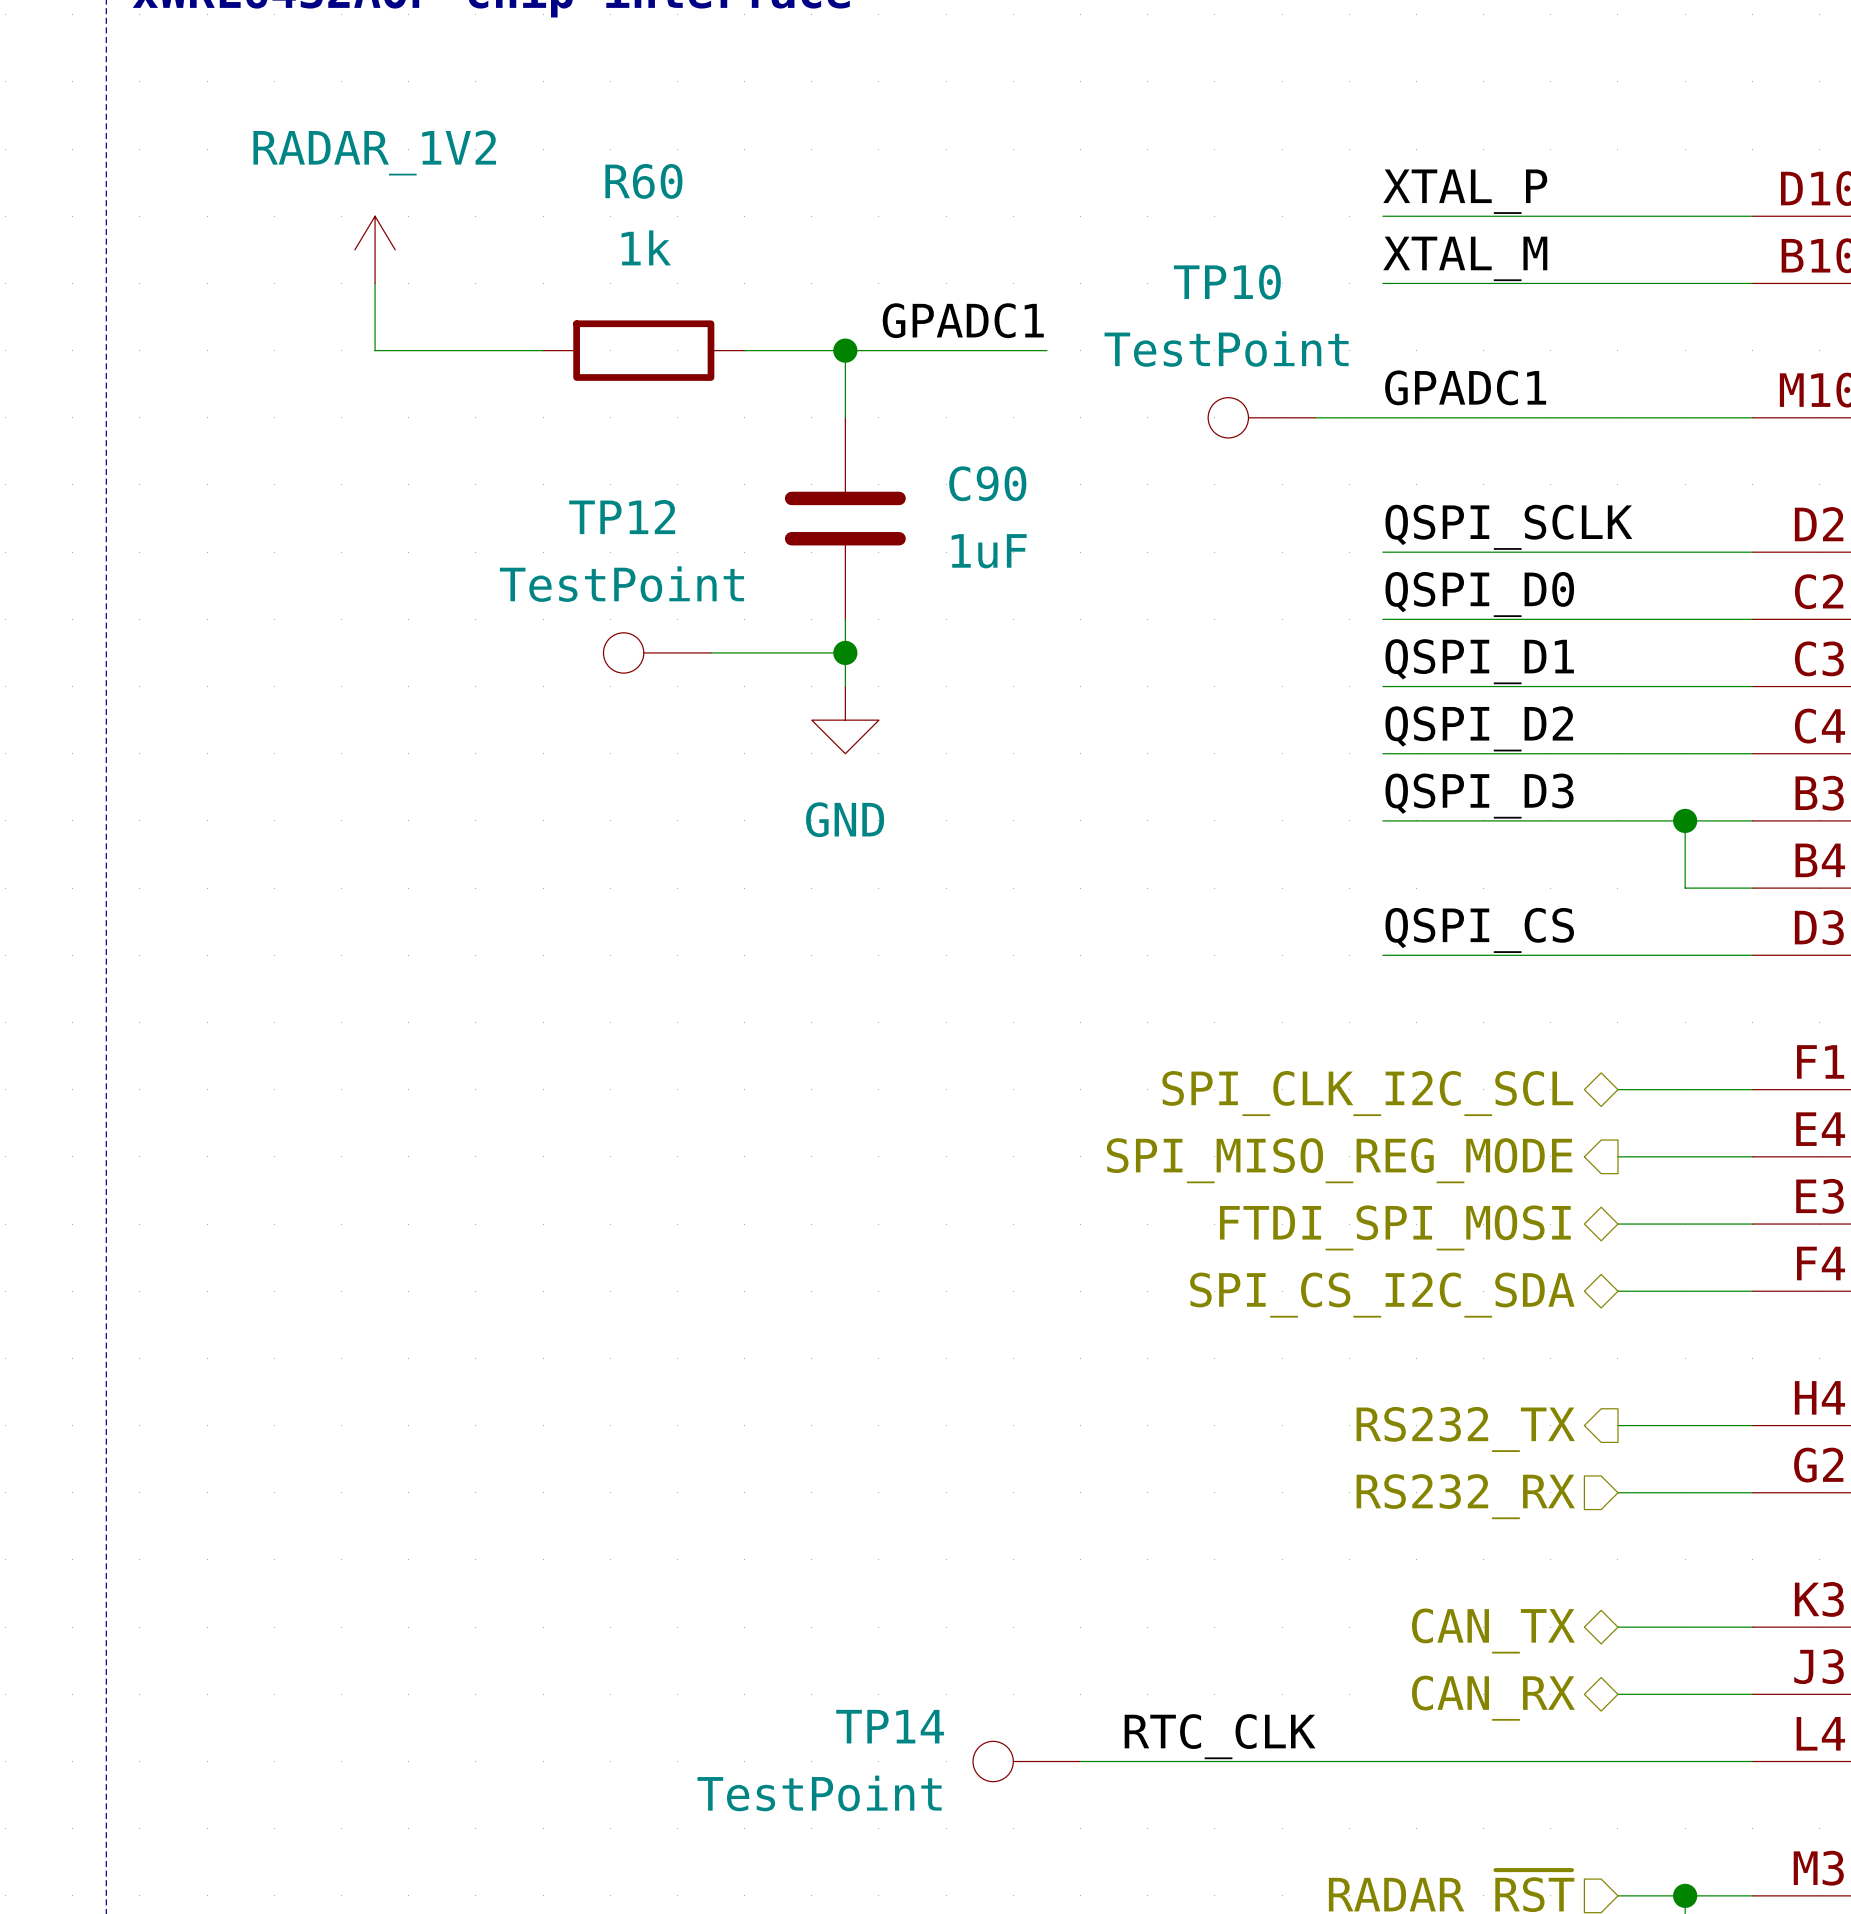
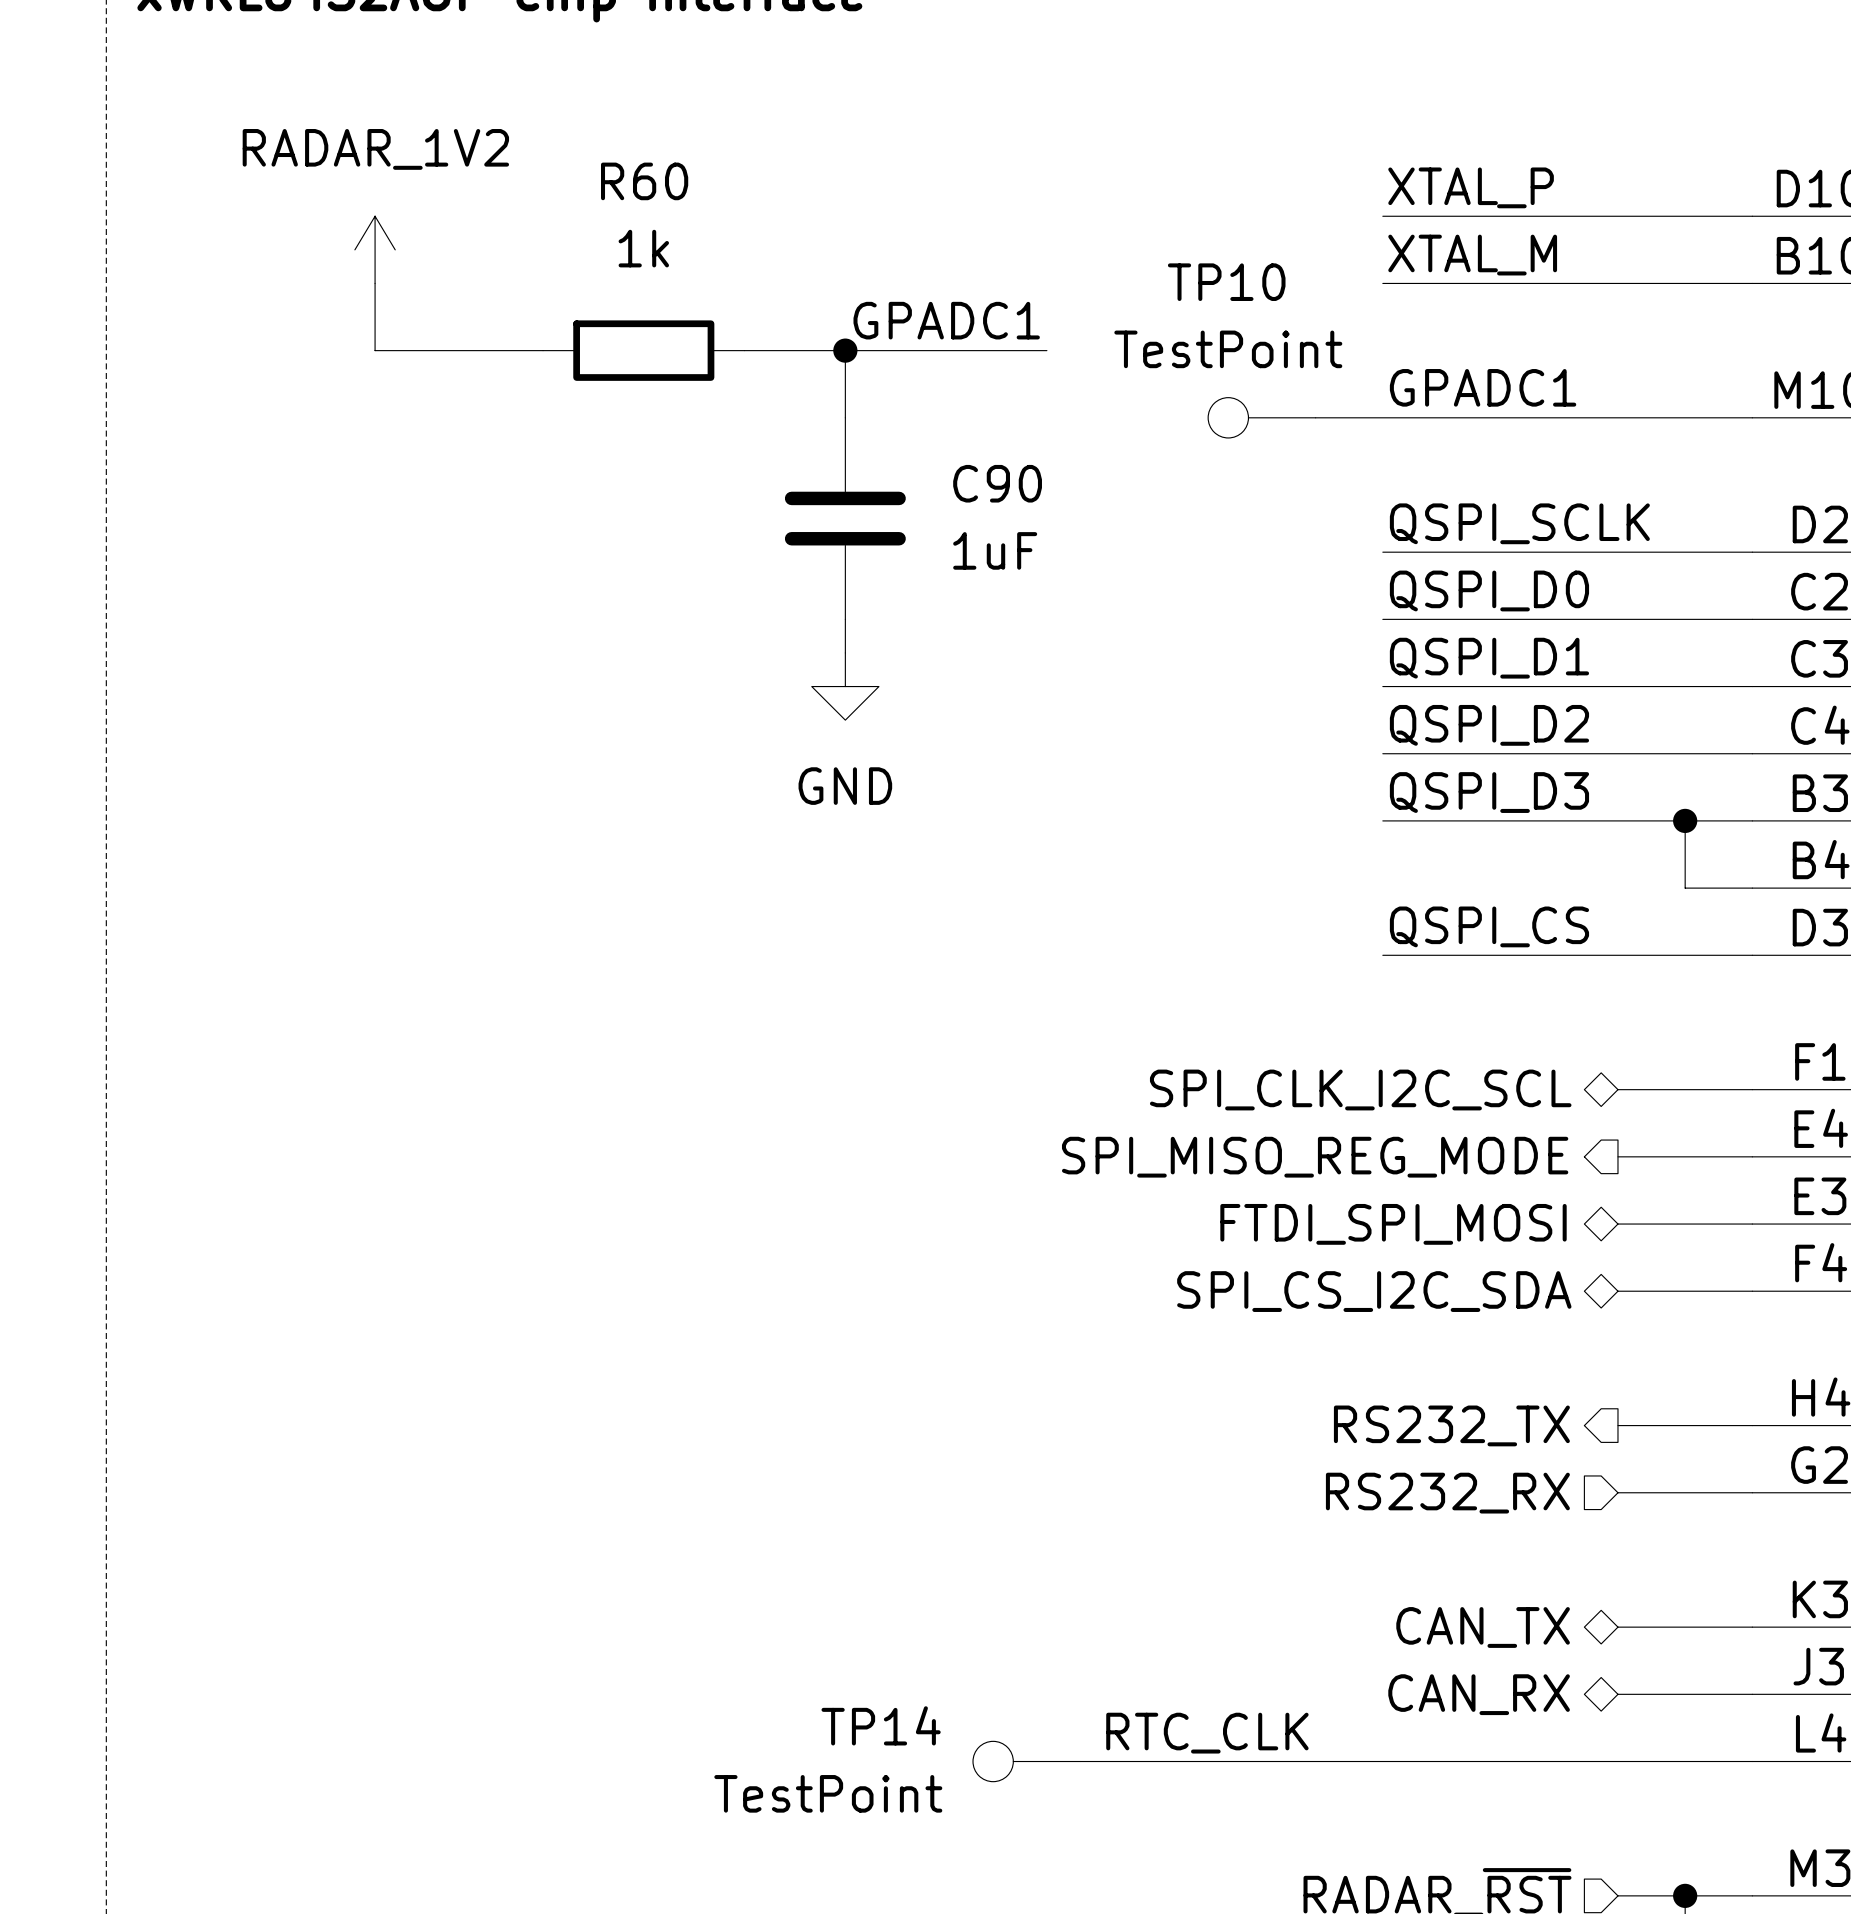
TP12: TestPoint (657, 652) -> none
wire: (710, 652) (845, 652) (845, 686) -> none
junction: (845, 652) -> none
power symbol position: GND (845, 720) -> GND (845, 686)

